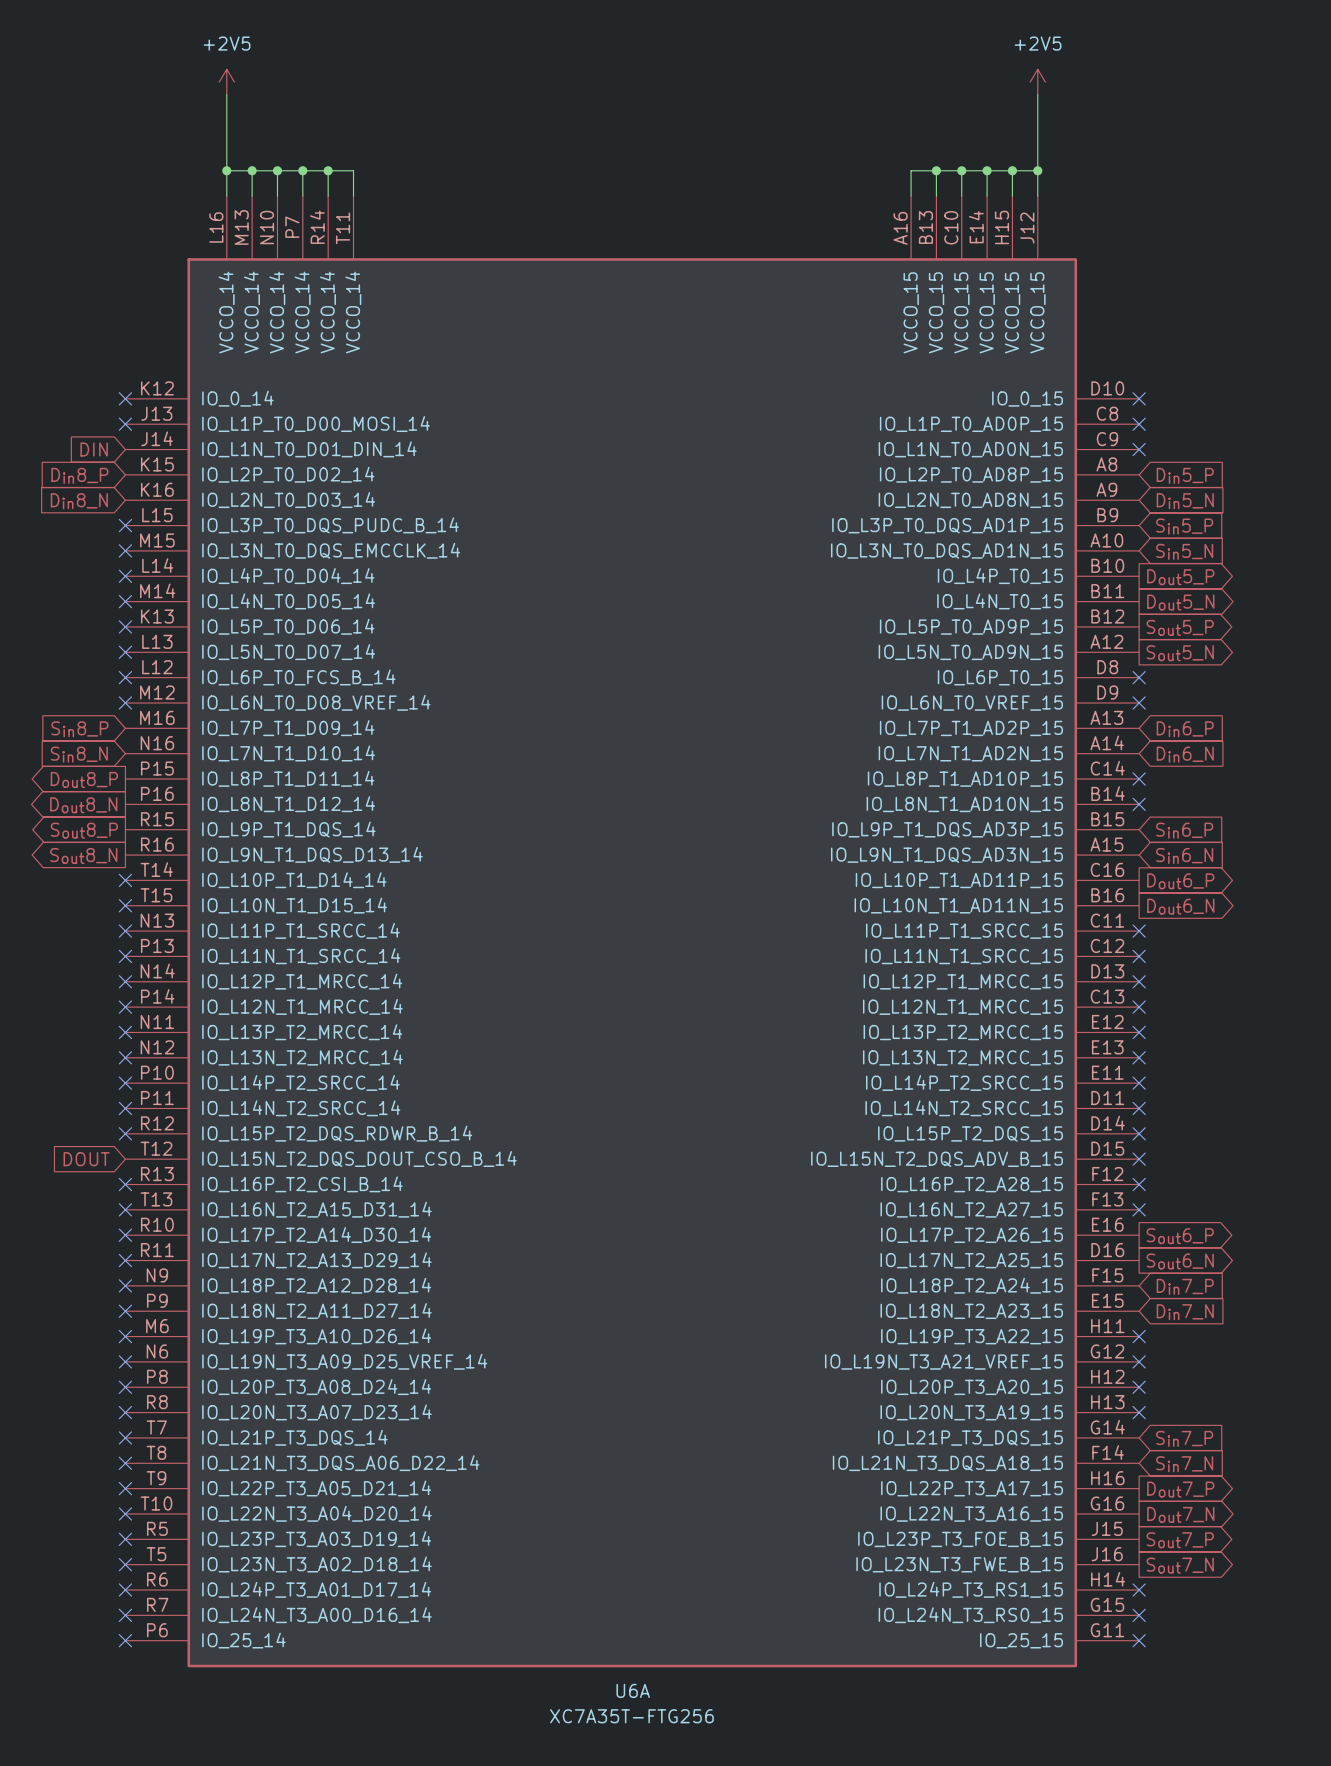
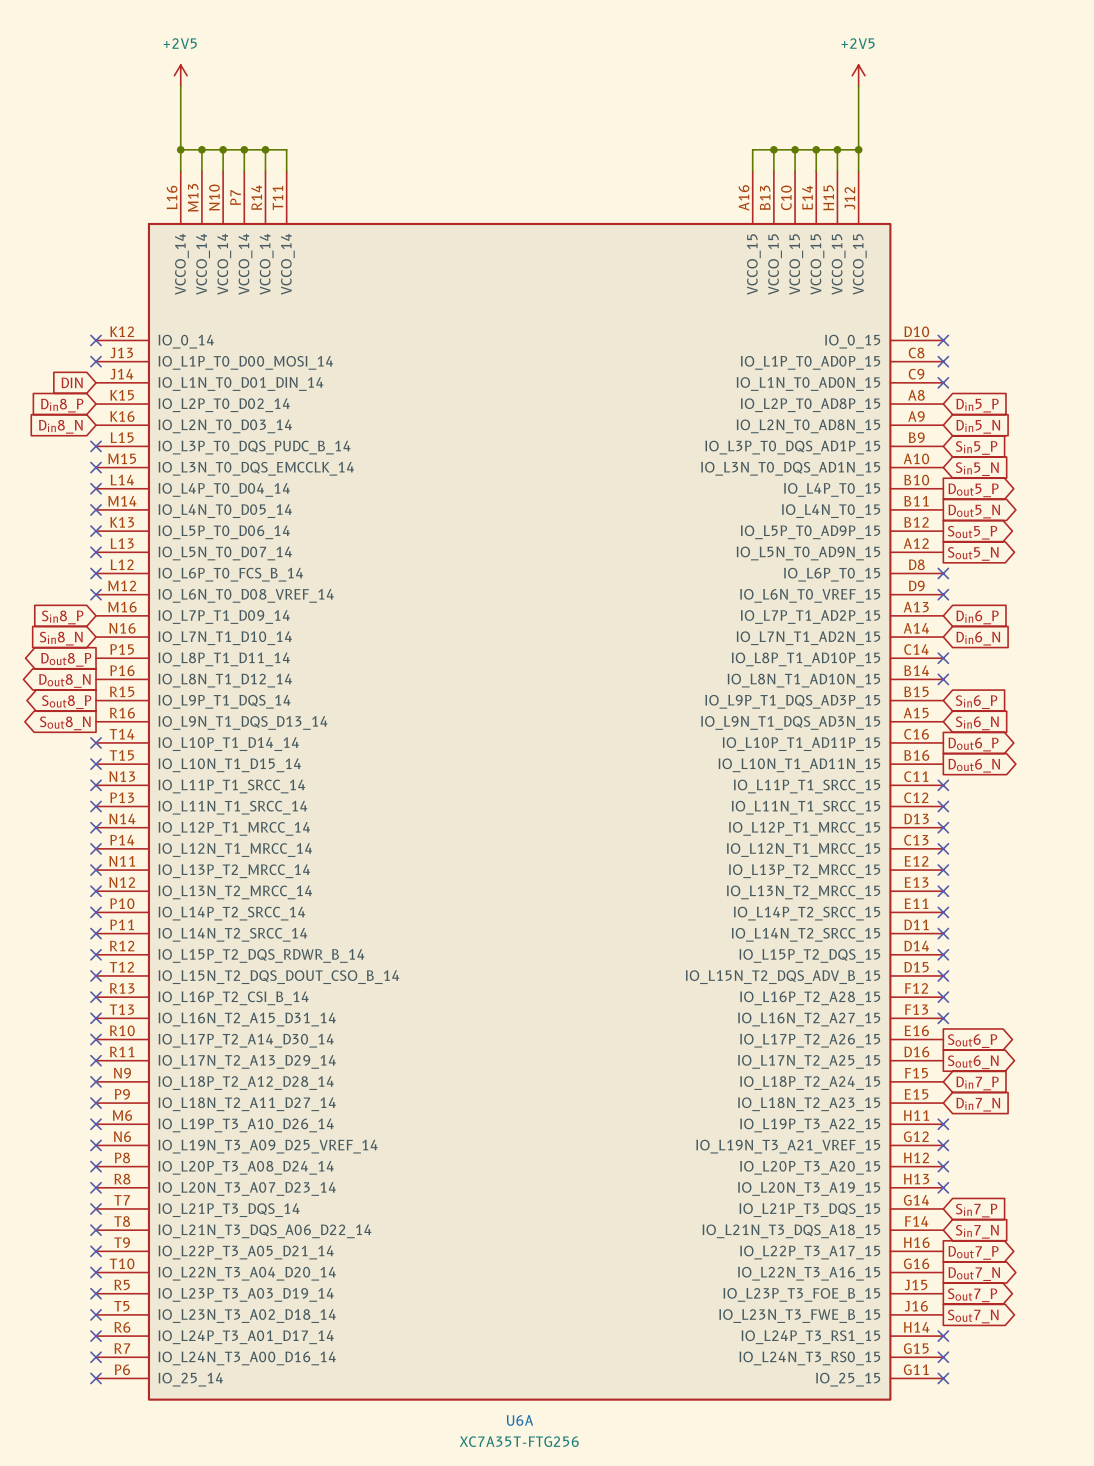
global label: DOUT (86, 1159) -> none
no-connect mark: none -> (96, 975)

